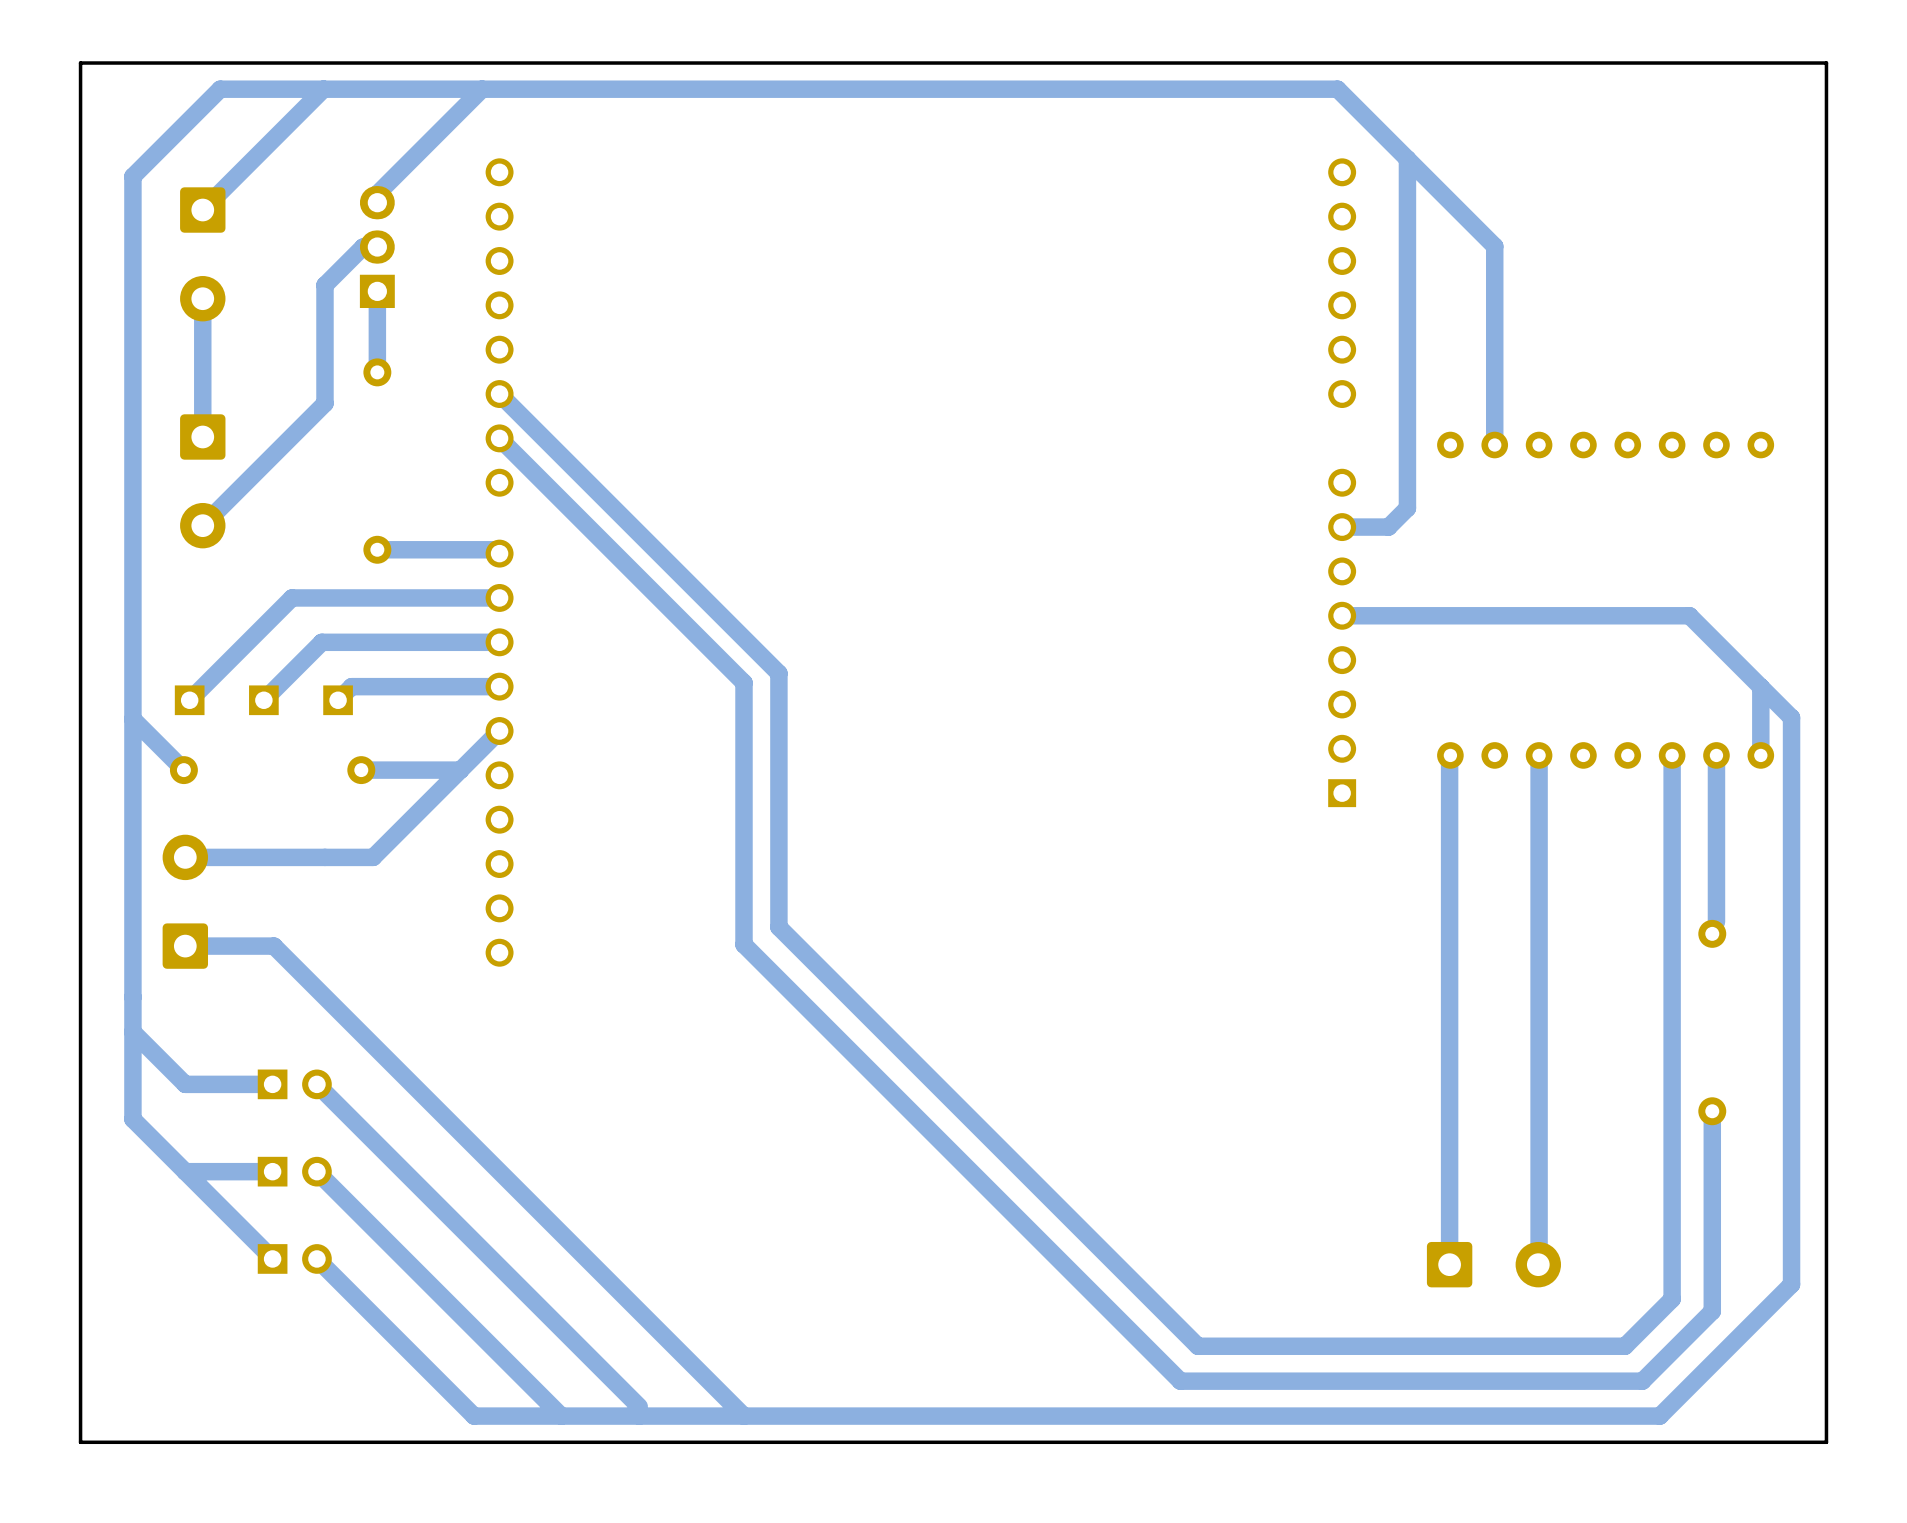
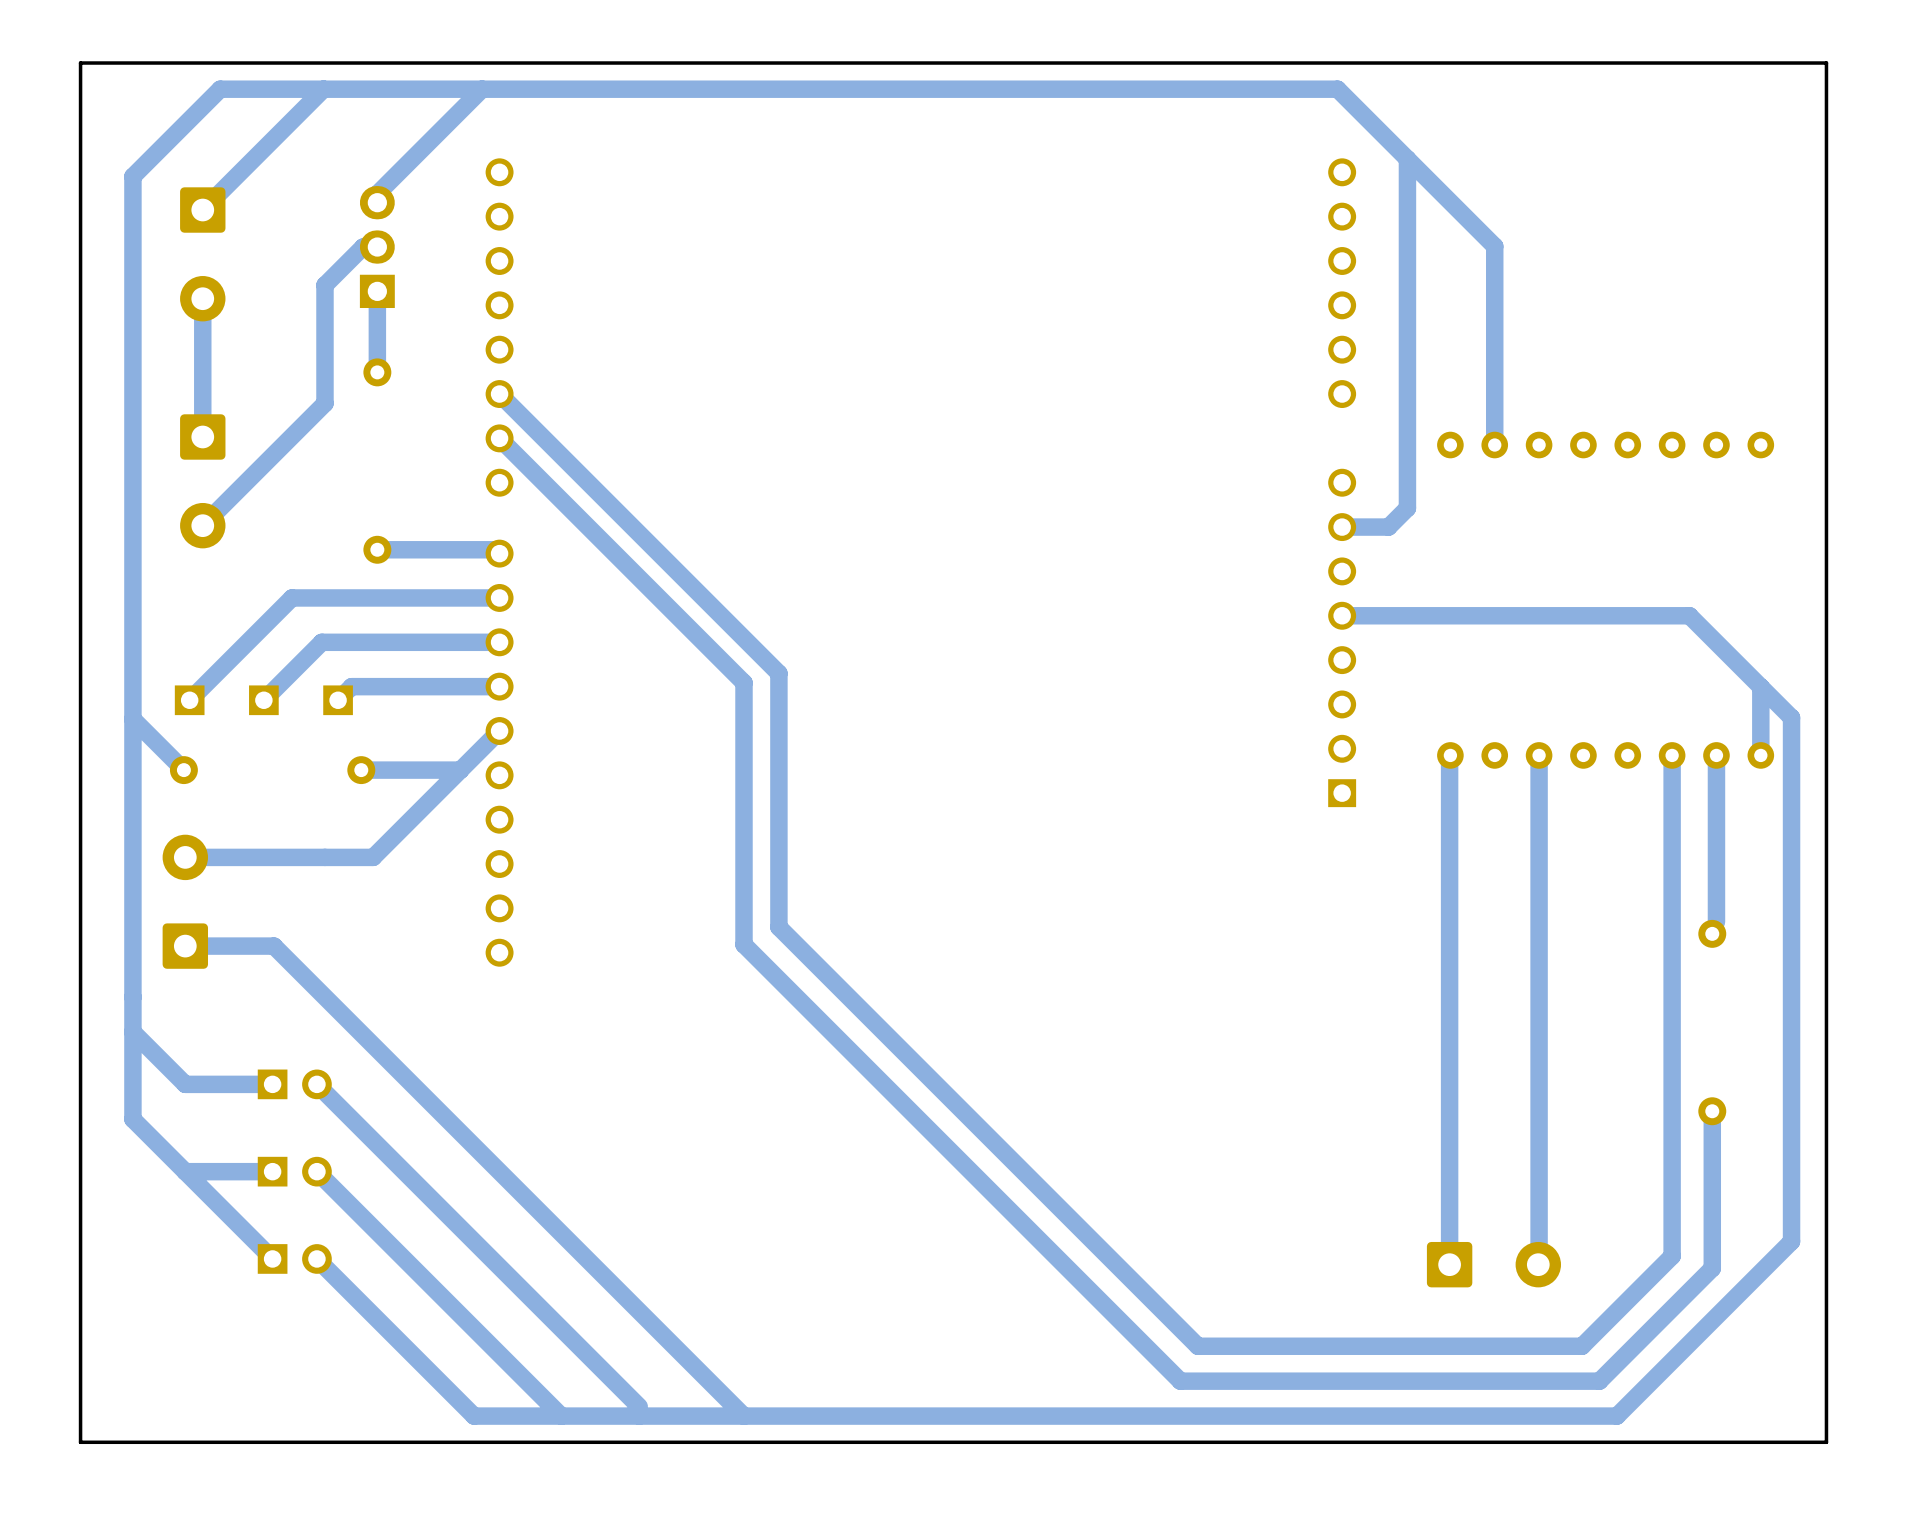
track: (1791, 1241) (1791, 1284) (1659, 1416) (1616, 1416) -> (1791, 1241) (1616, 1416)
track: (1672, 1256) (1672, 1299) (1624, 1346) (1582, 1346) -> (1672, 1256) (1582, 1346)
track: (1712, 1268) (1712, 1311) (1642, 1381) (1599, 1381) -> (1712, 1268) (1599, 1381)

